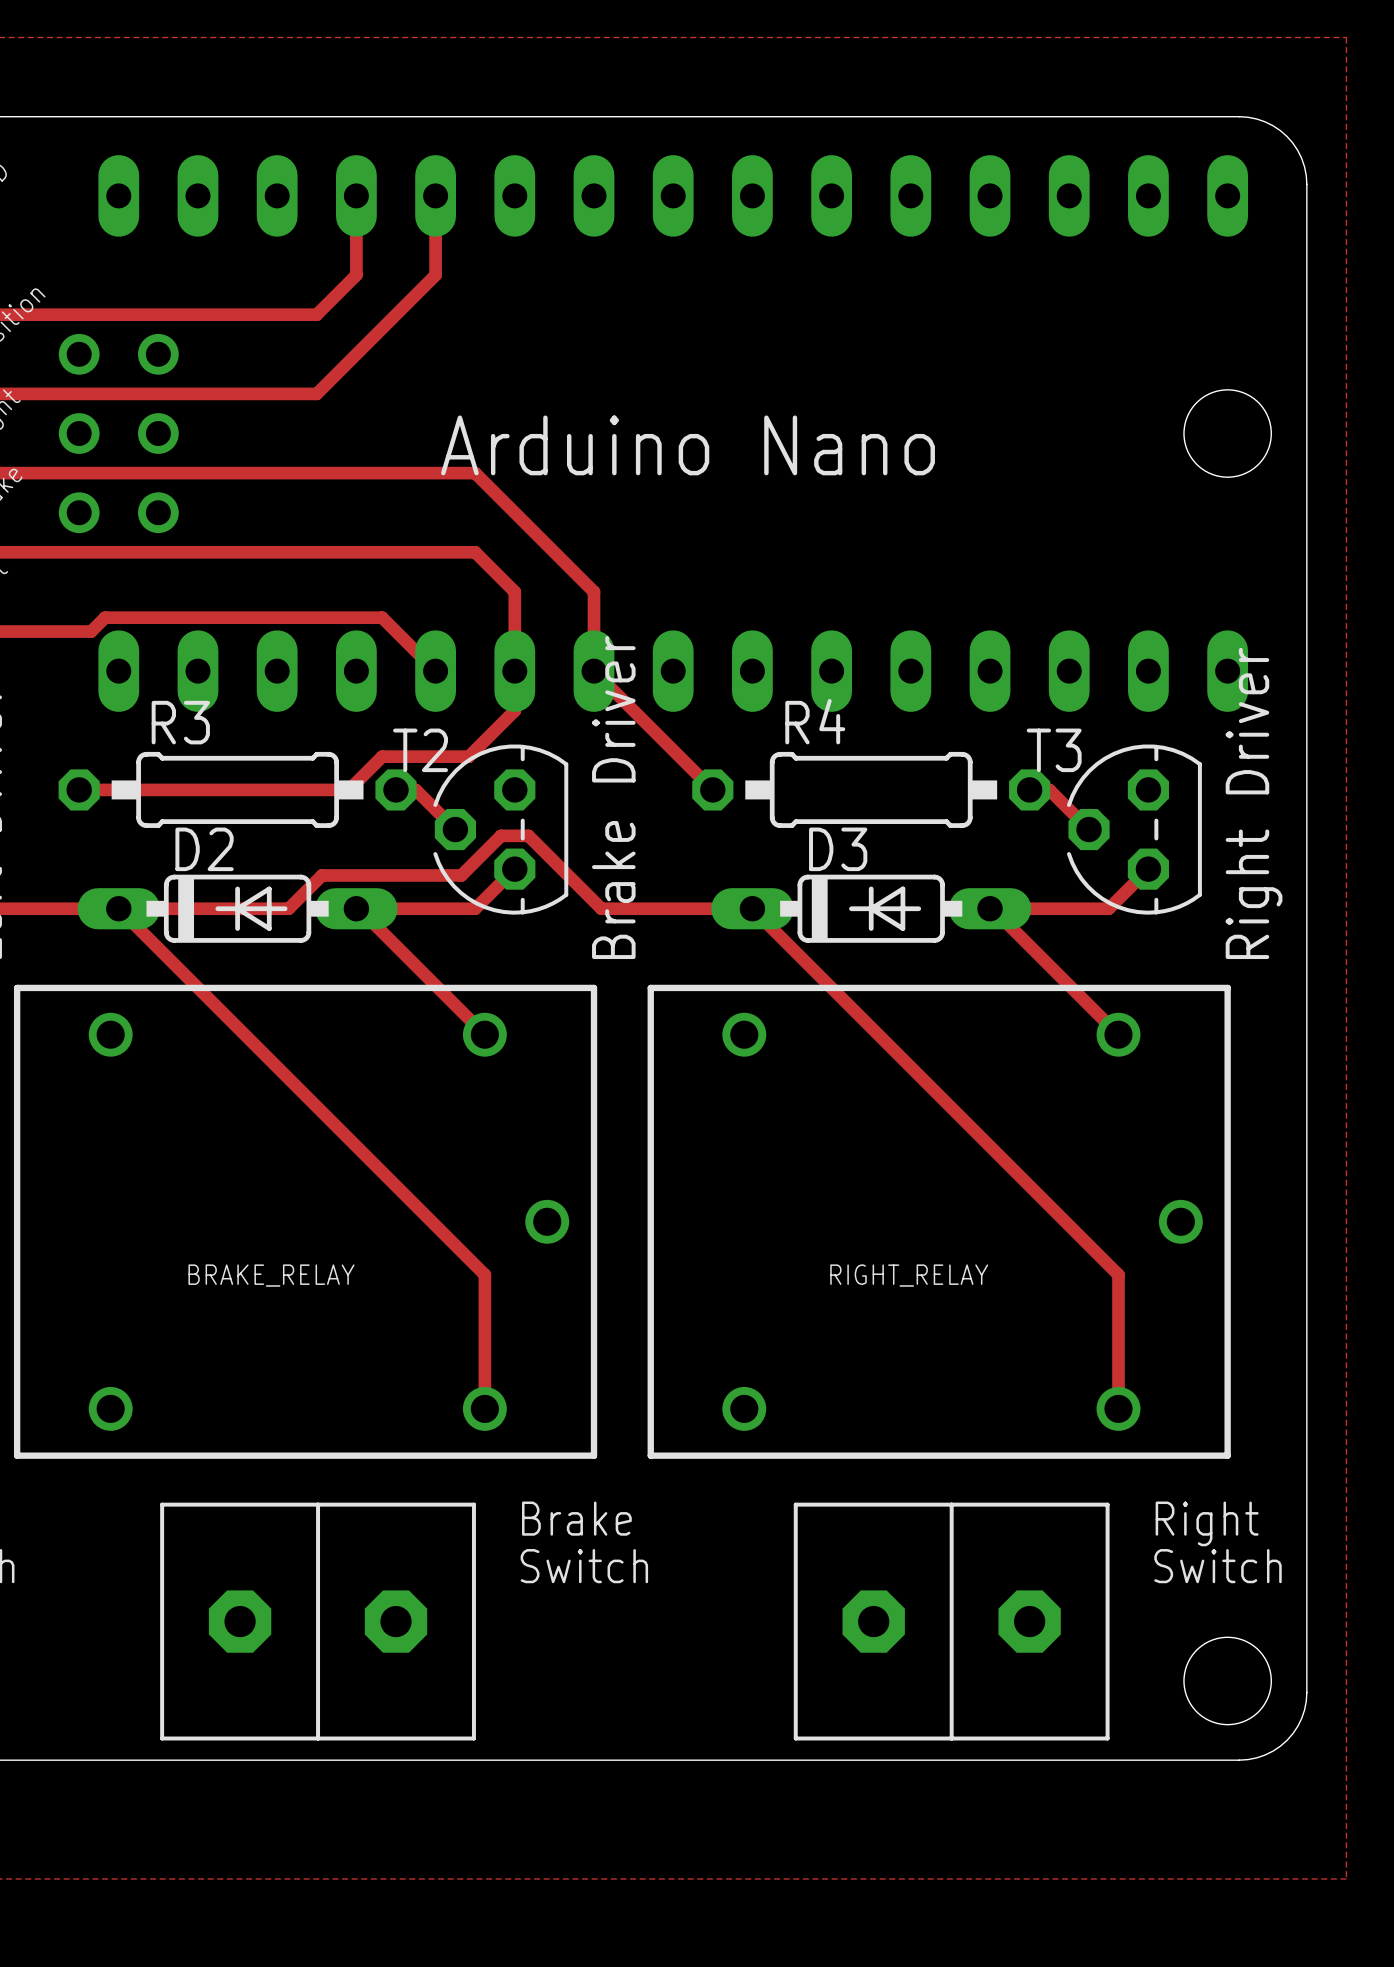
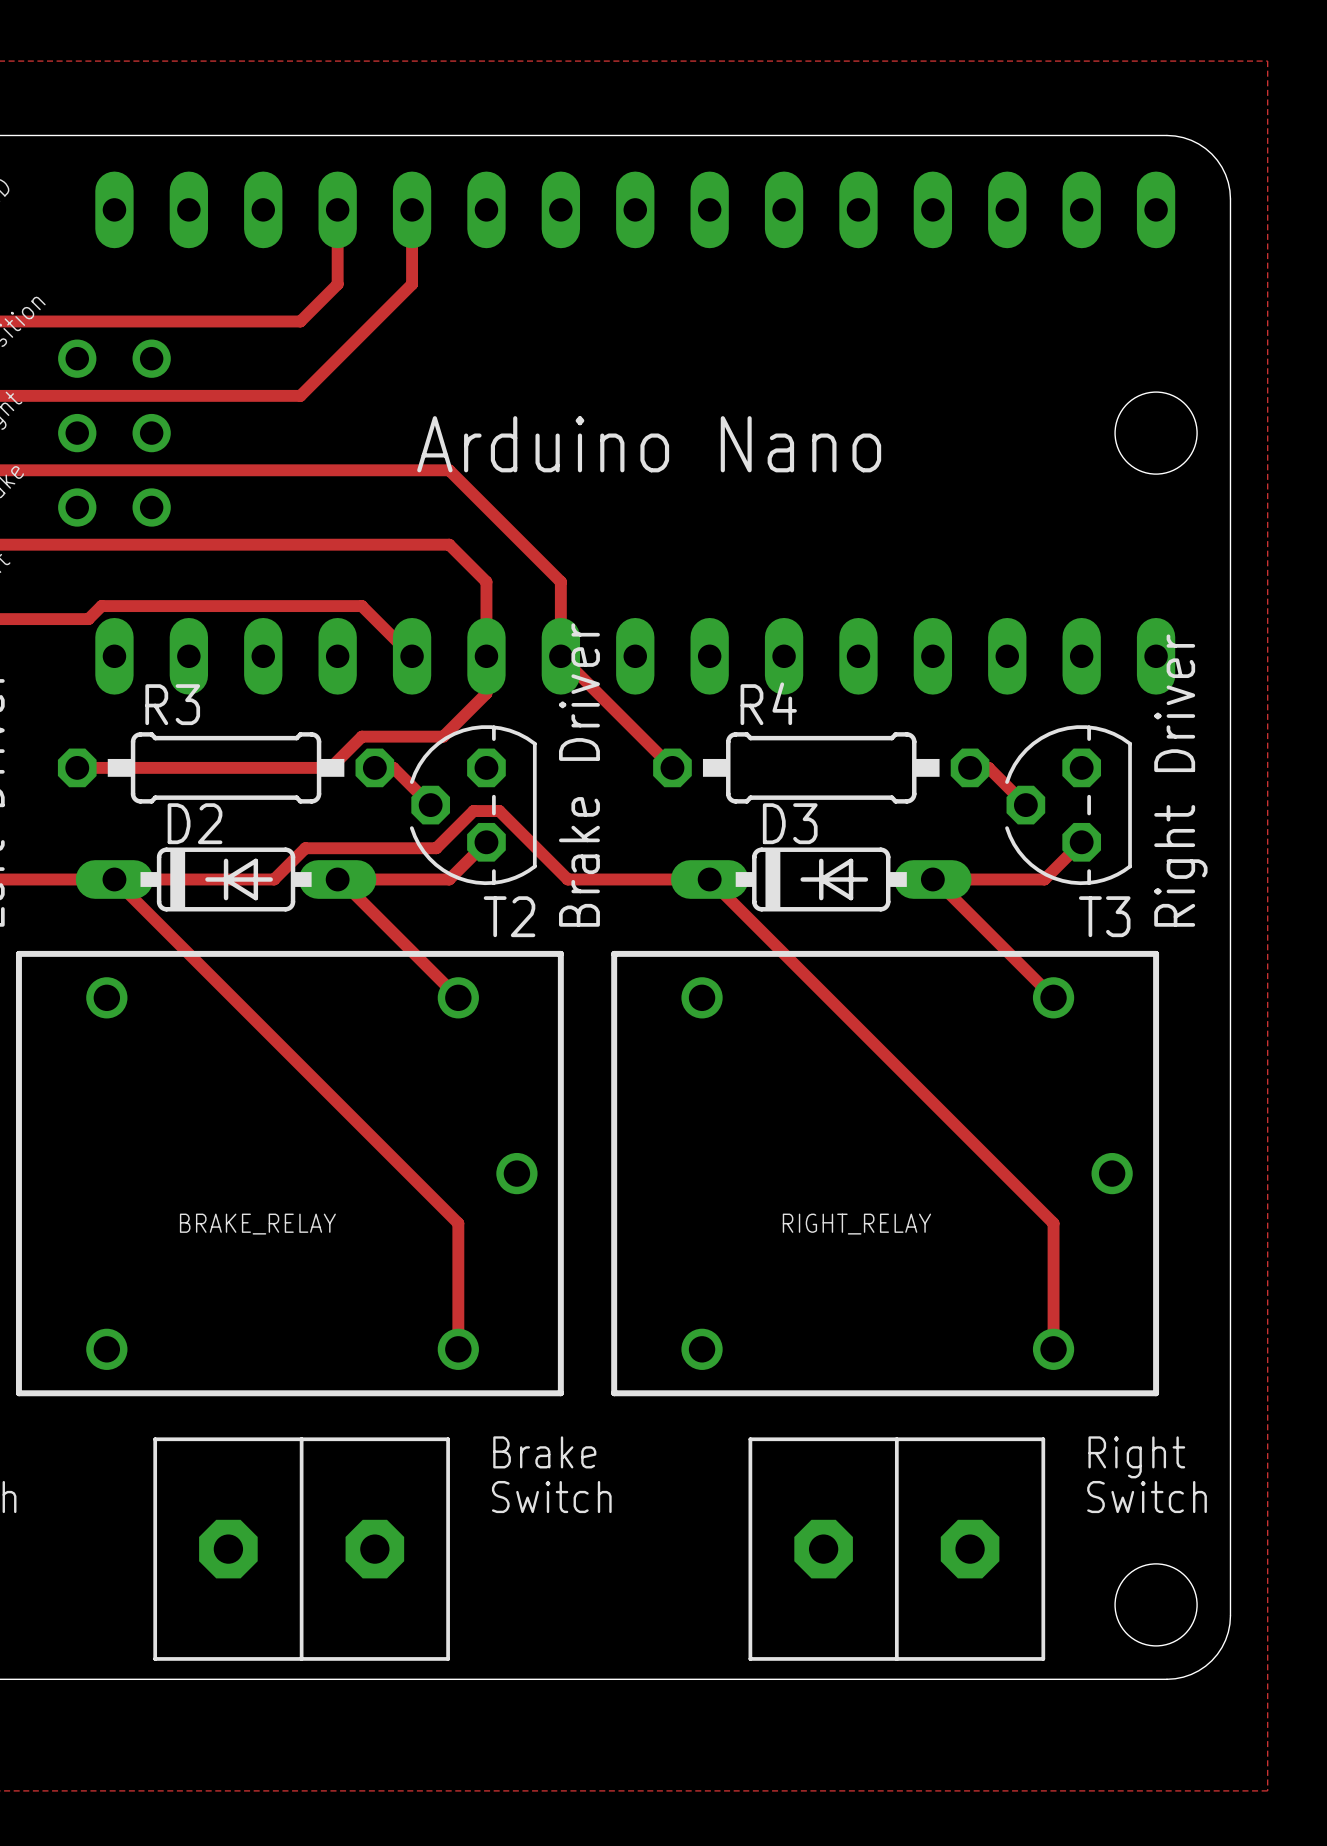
T2 name position: T2 (420, 750) -> T2 (509, 916)
T3 name position: T3 (1054, 750) -> T3 (1104, 916)

